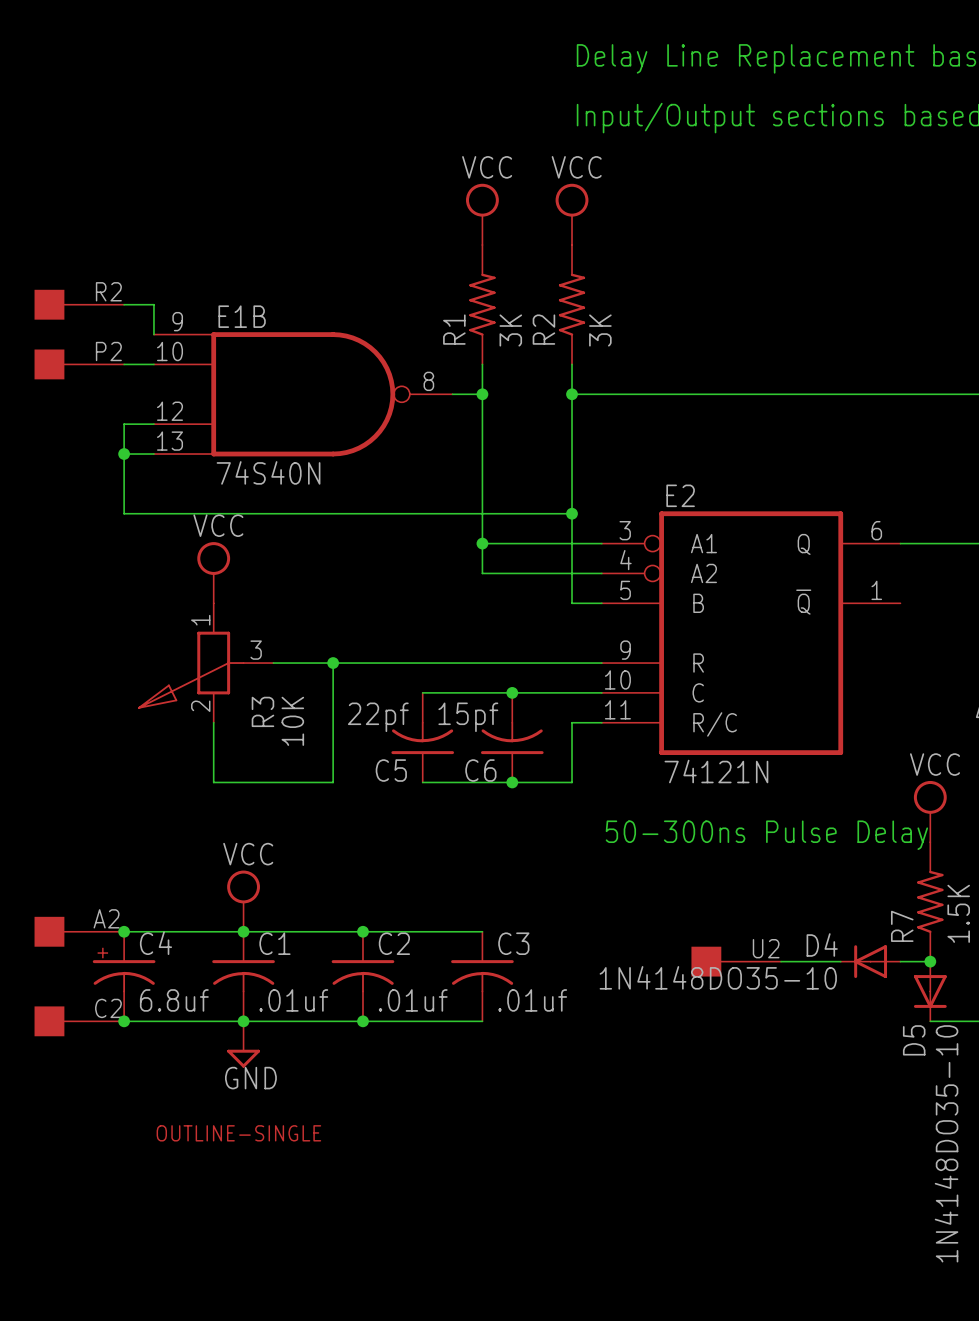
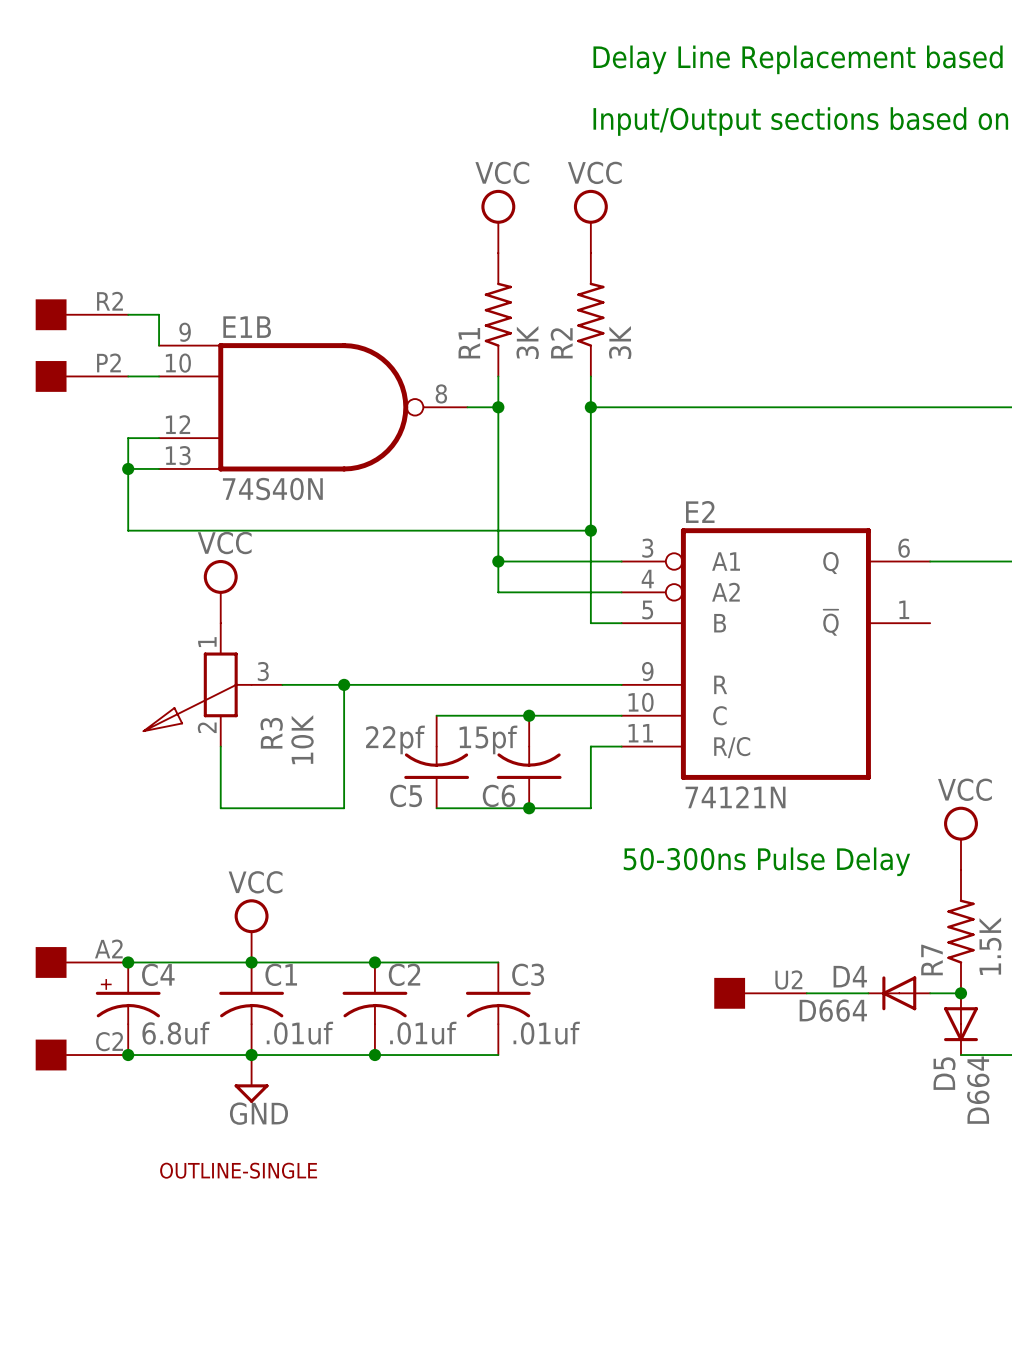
D4 value: 1N4148DO35-10 (718, 977) -> D664 (833, 1010)
D5 value: 1N4148DO35-10 (946, 1143) -> D664 (978, 1090)

